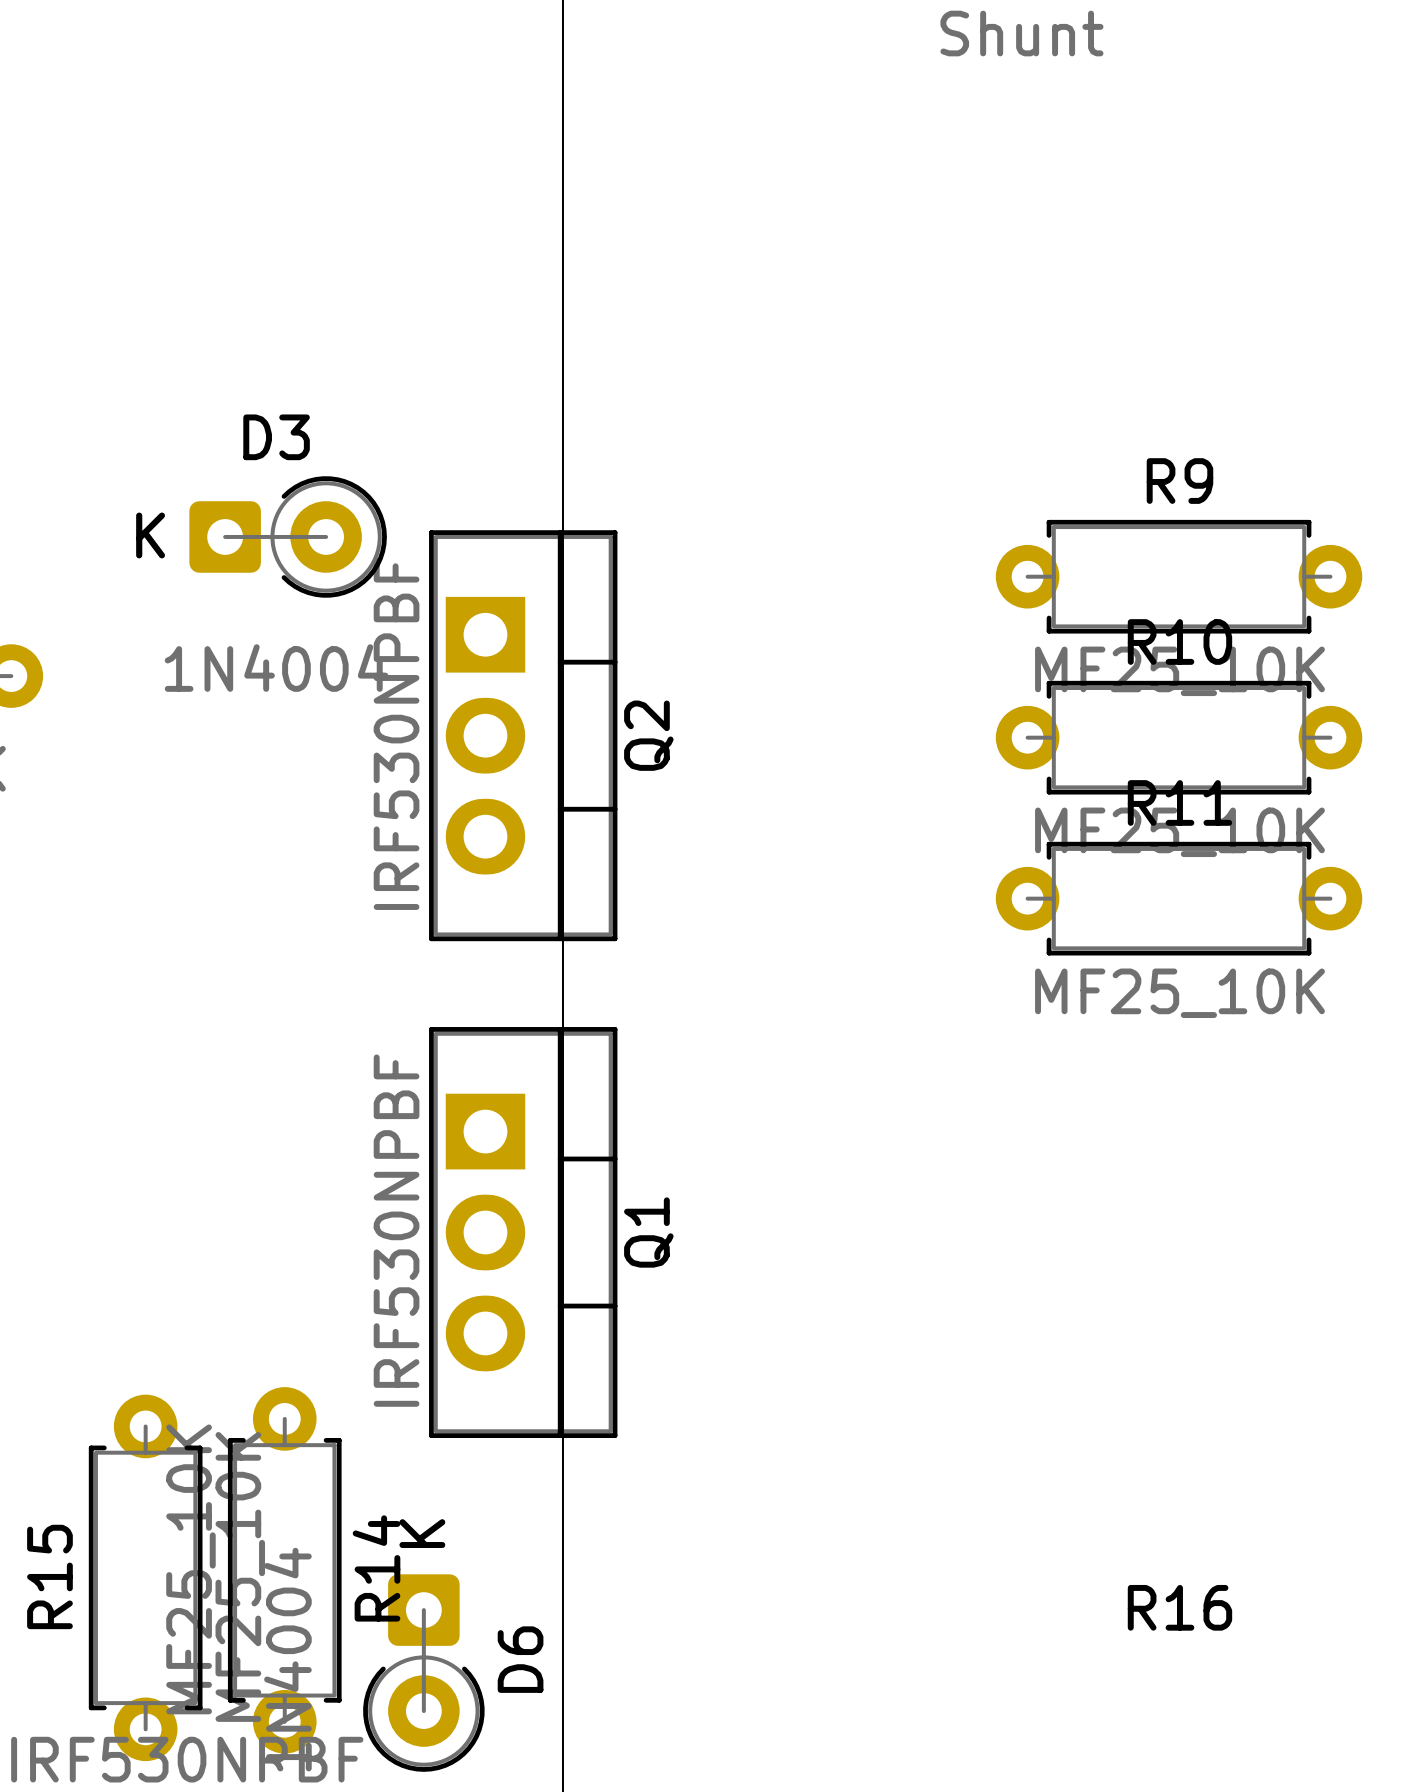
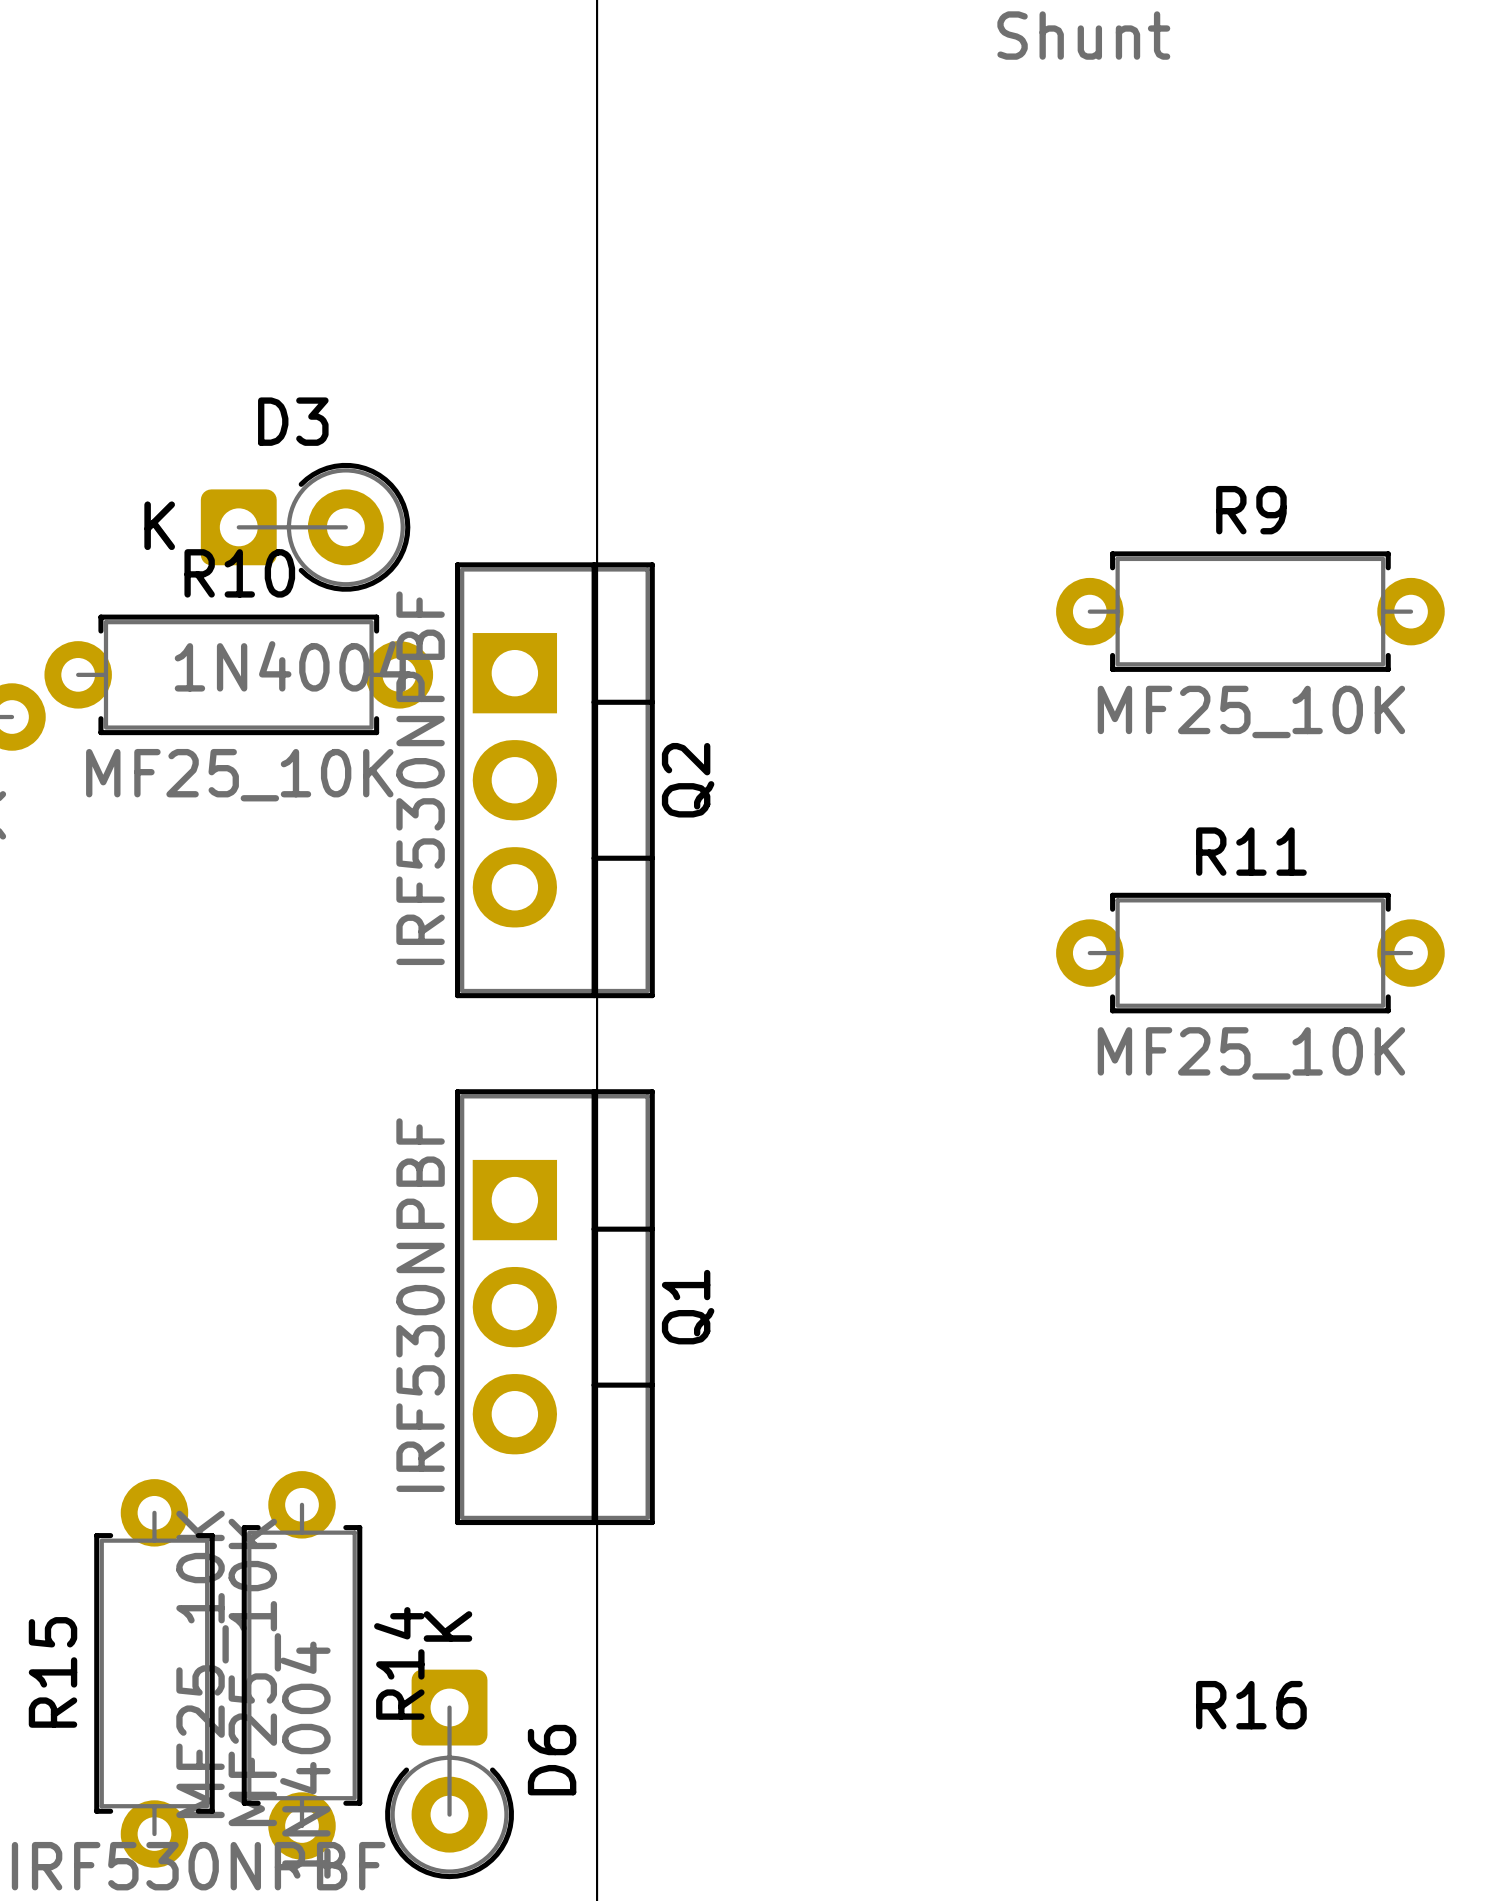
D3 position: (288, 536) -> (305, 527)
R10 position: (1179, 737) -> (238, 674)

